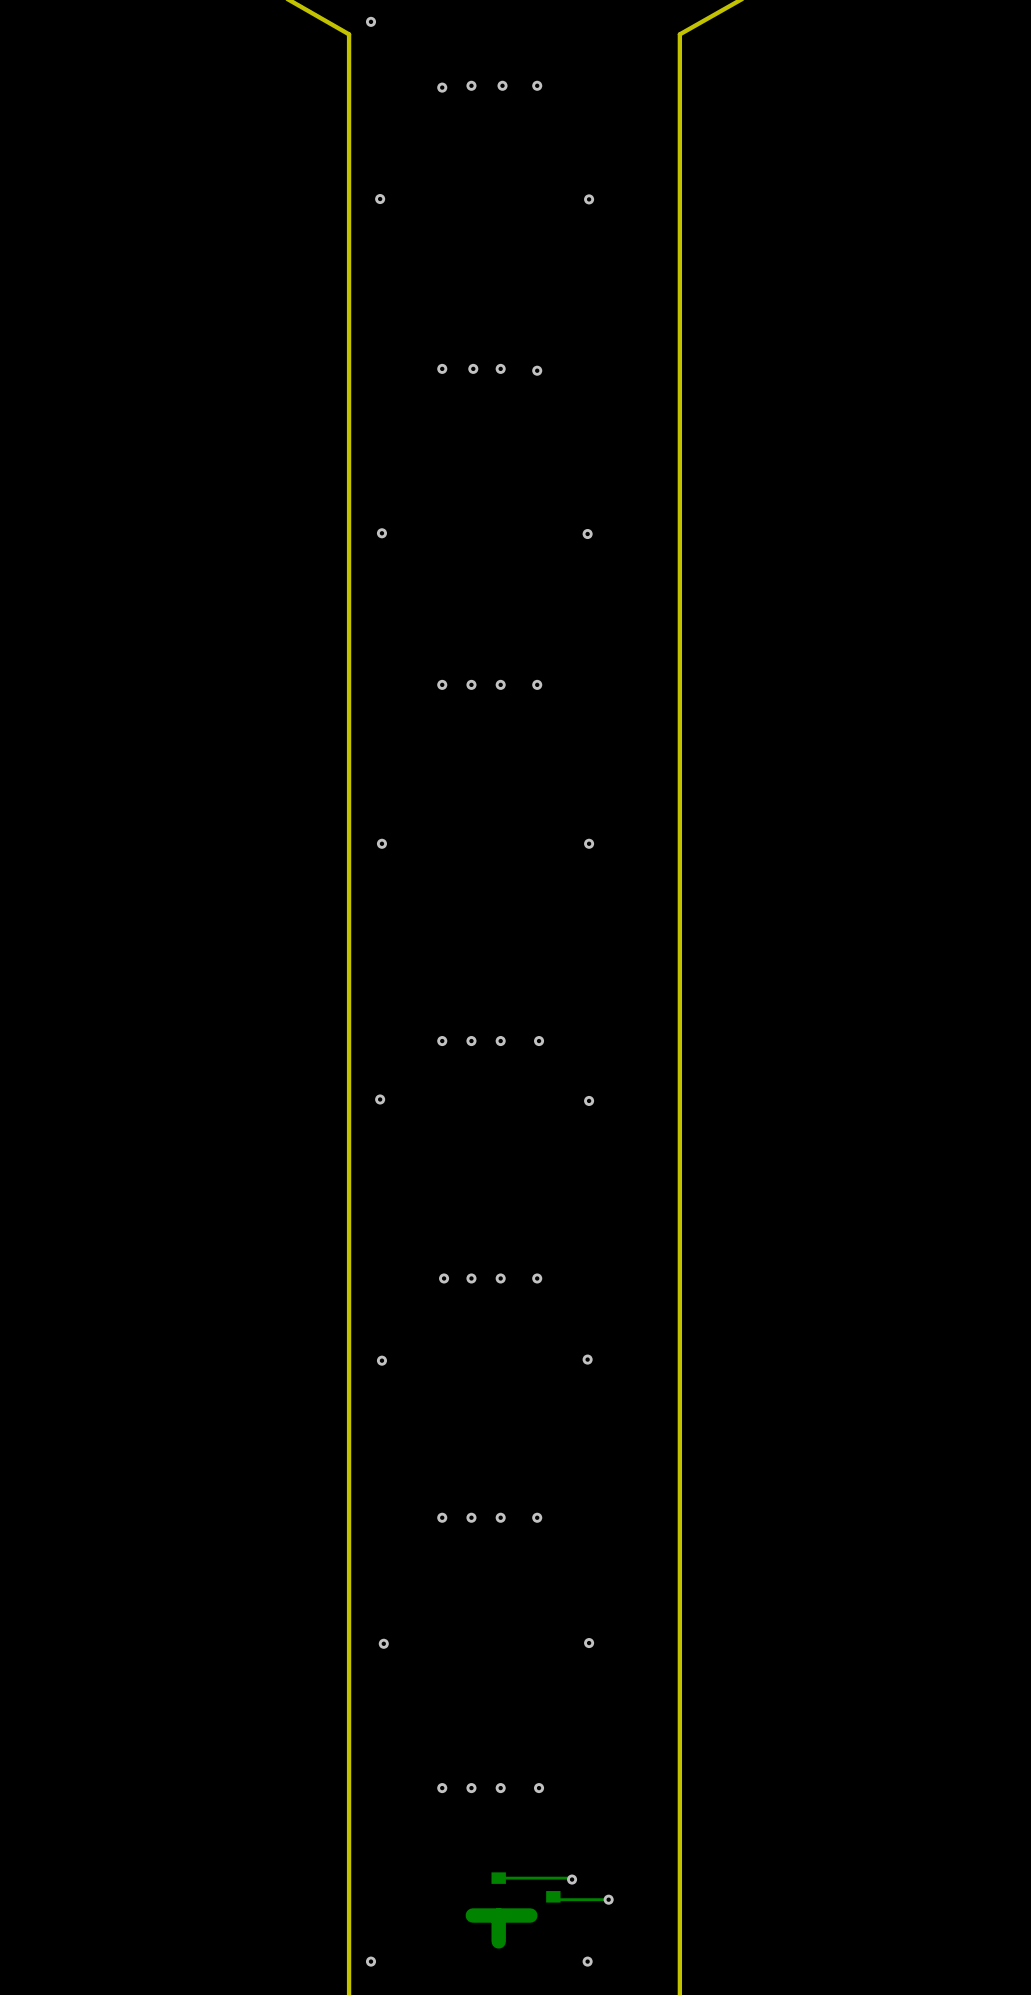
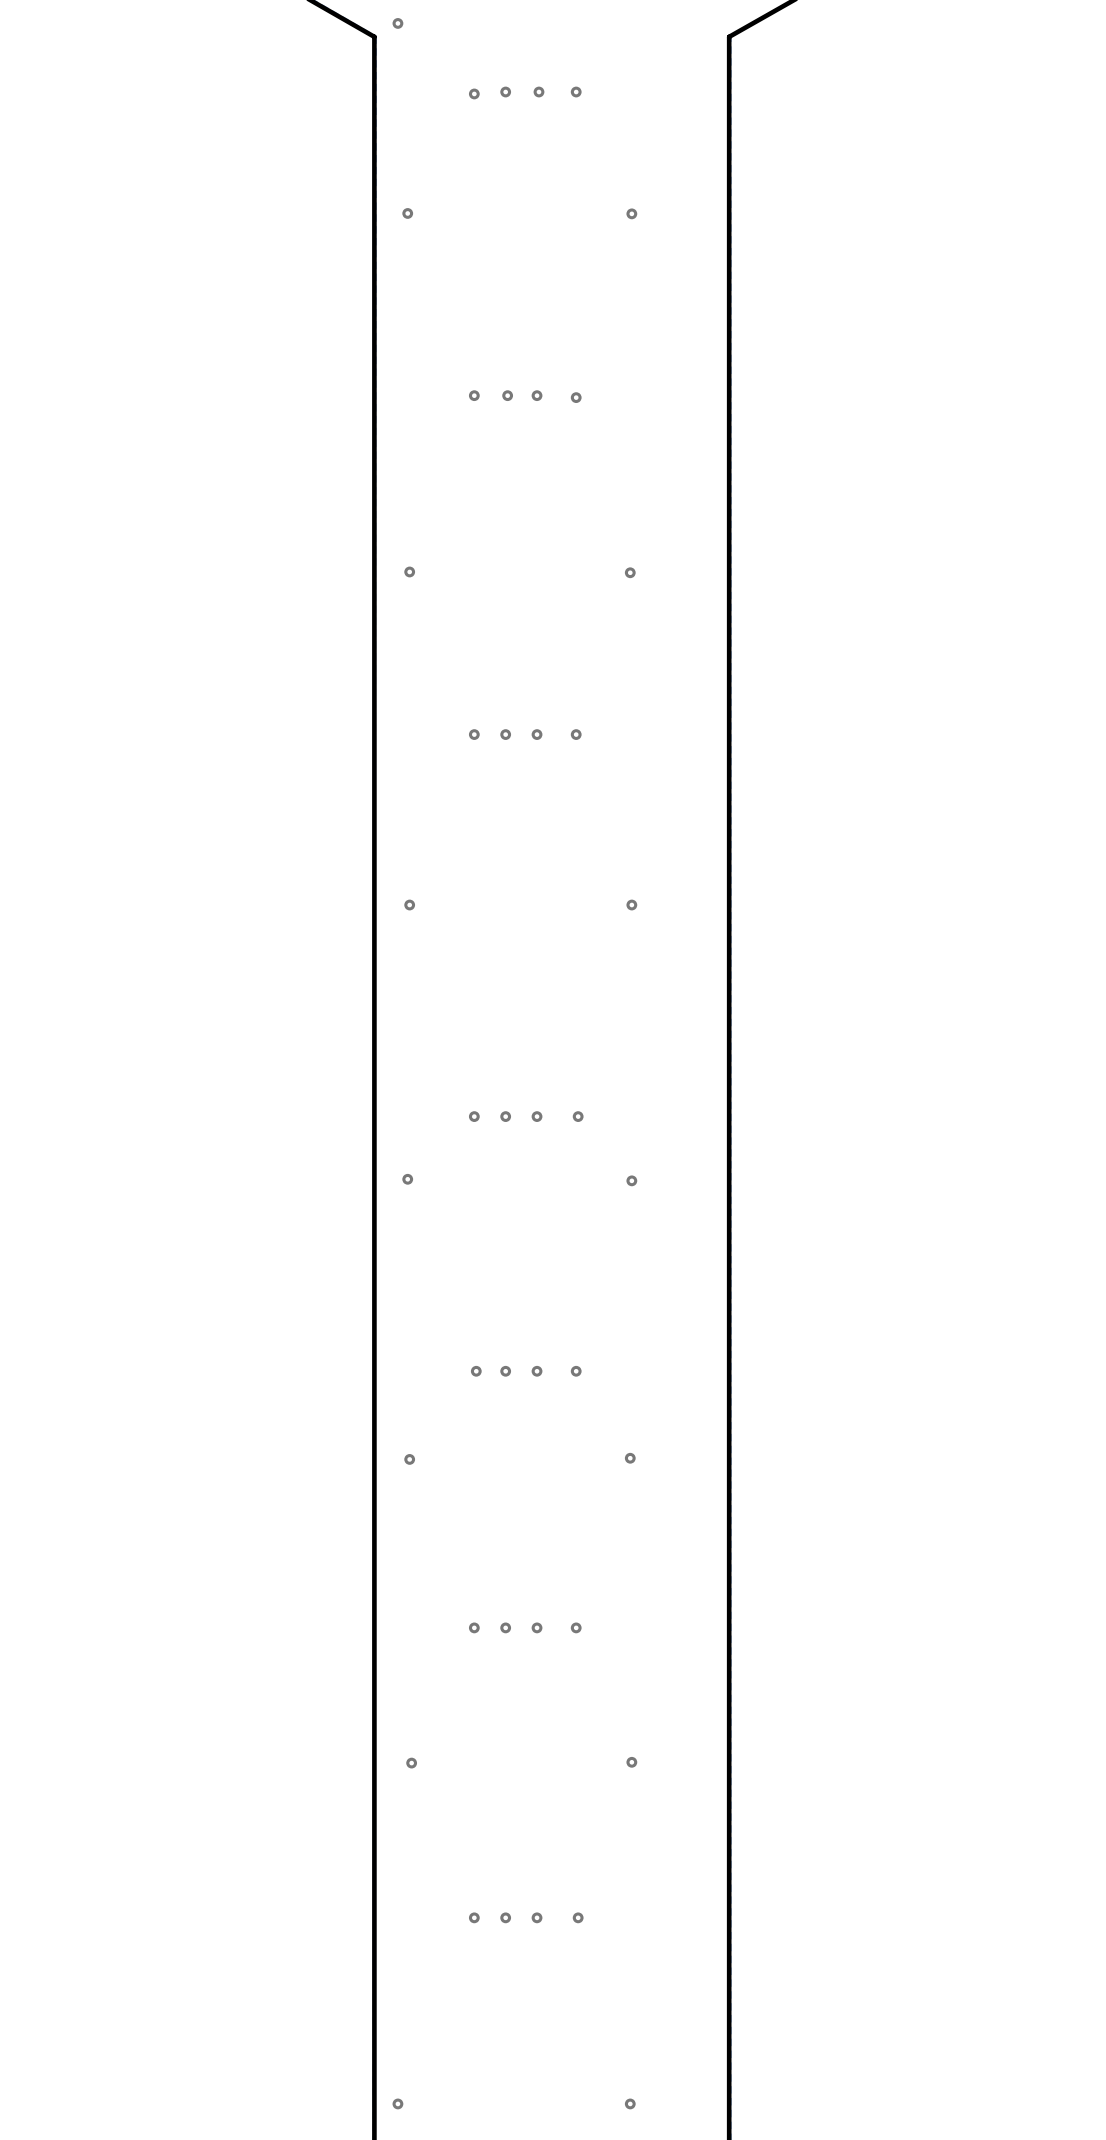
track: (498, 1878) (572, 1879) -> none
via: (572, 1879) -> none
part: (526, 1896) -> none
track: (553, 1896) (556, 1899) (608, 1899) -> none
via: (608, 1899) -> none
track: (498, 1915) (498, 1941) -> none
track: (530, 1915) (472, 1915) -> none

